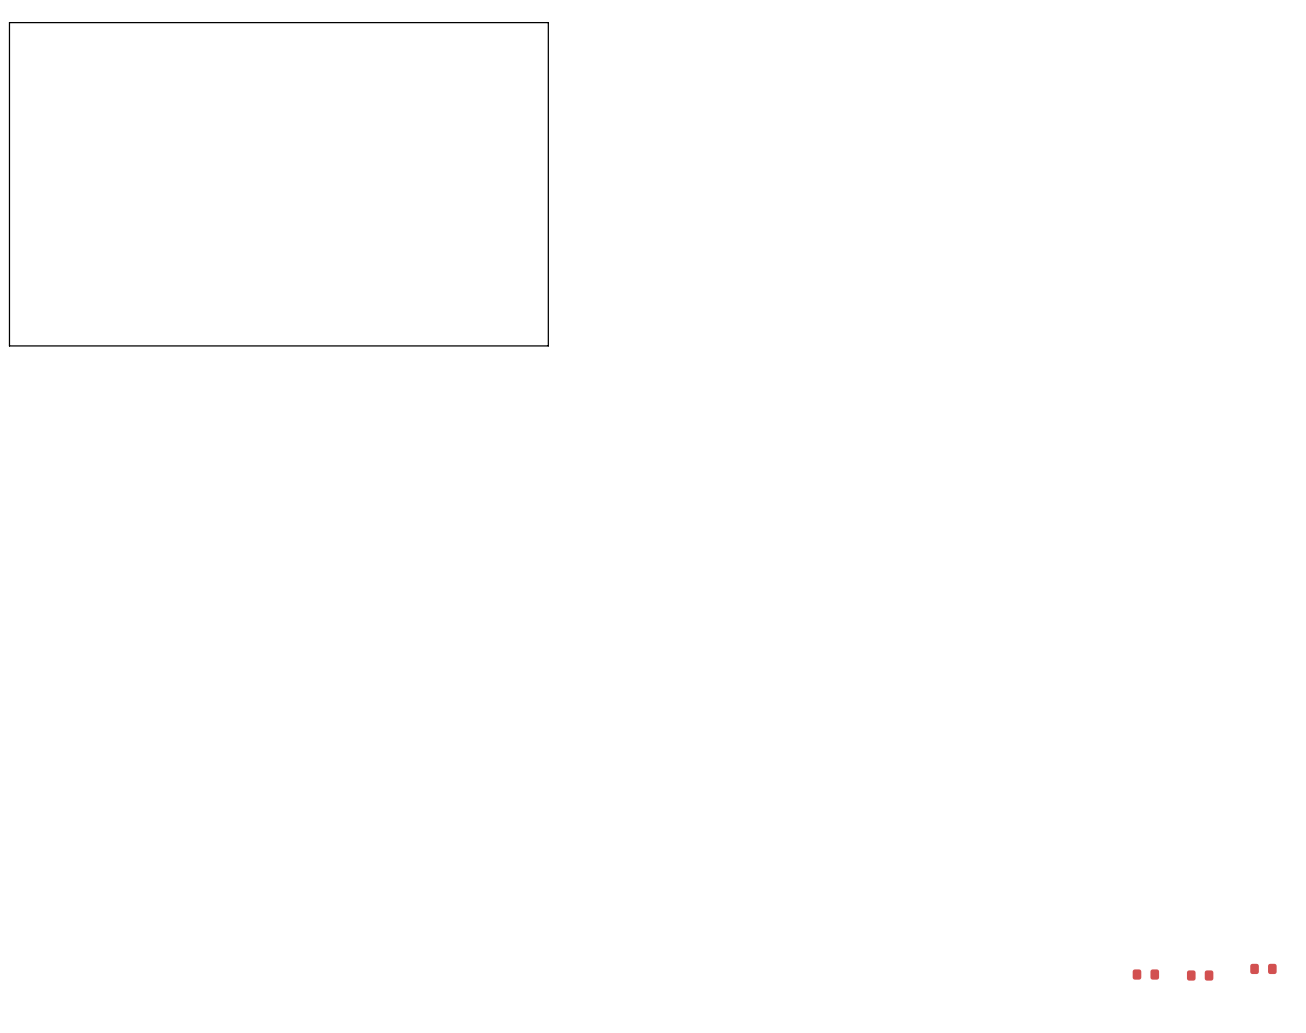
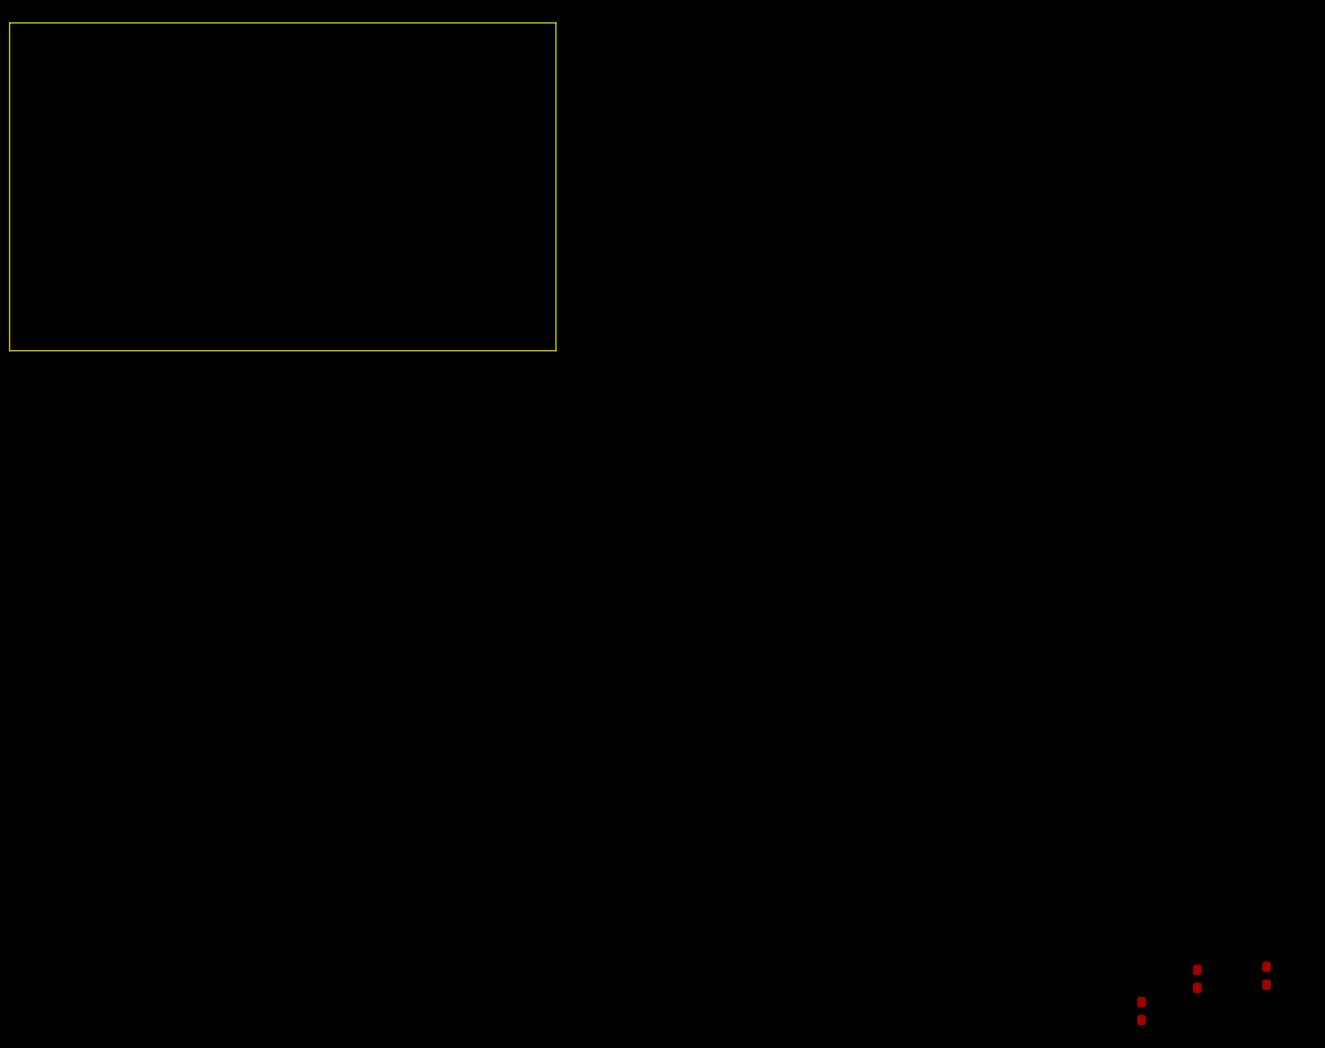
part: none -> (1266, 975)
part: none -> (1197, 978)
part: (1263, 968) -> none
part: (1145, 974) -> none
part: (1200, 975) -> none
part: none -> (1141, 1011)

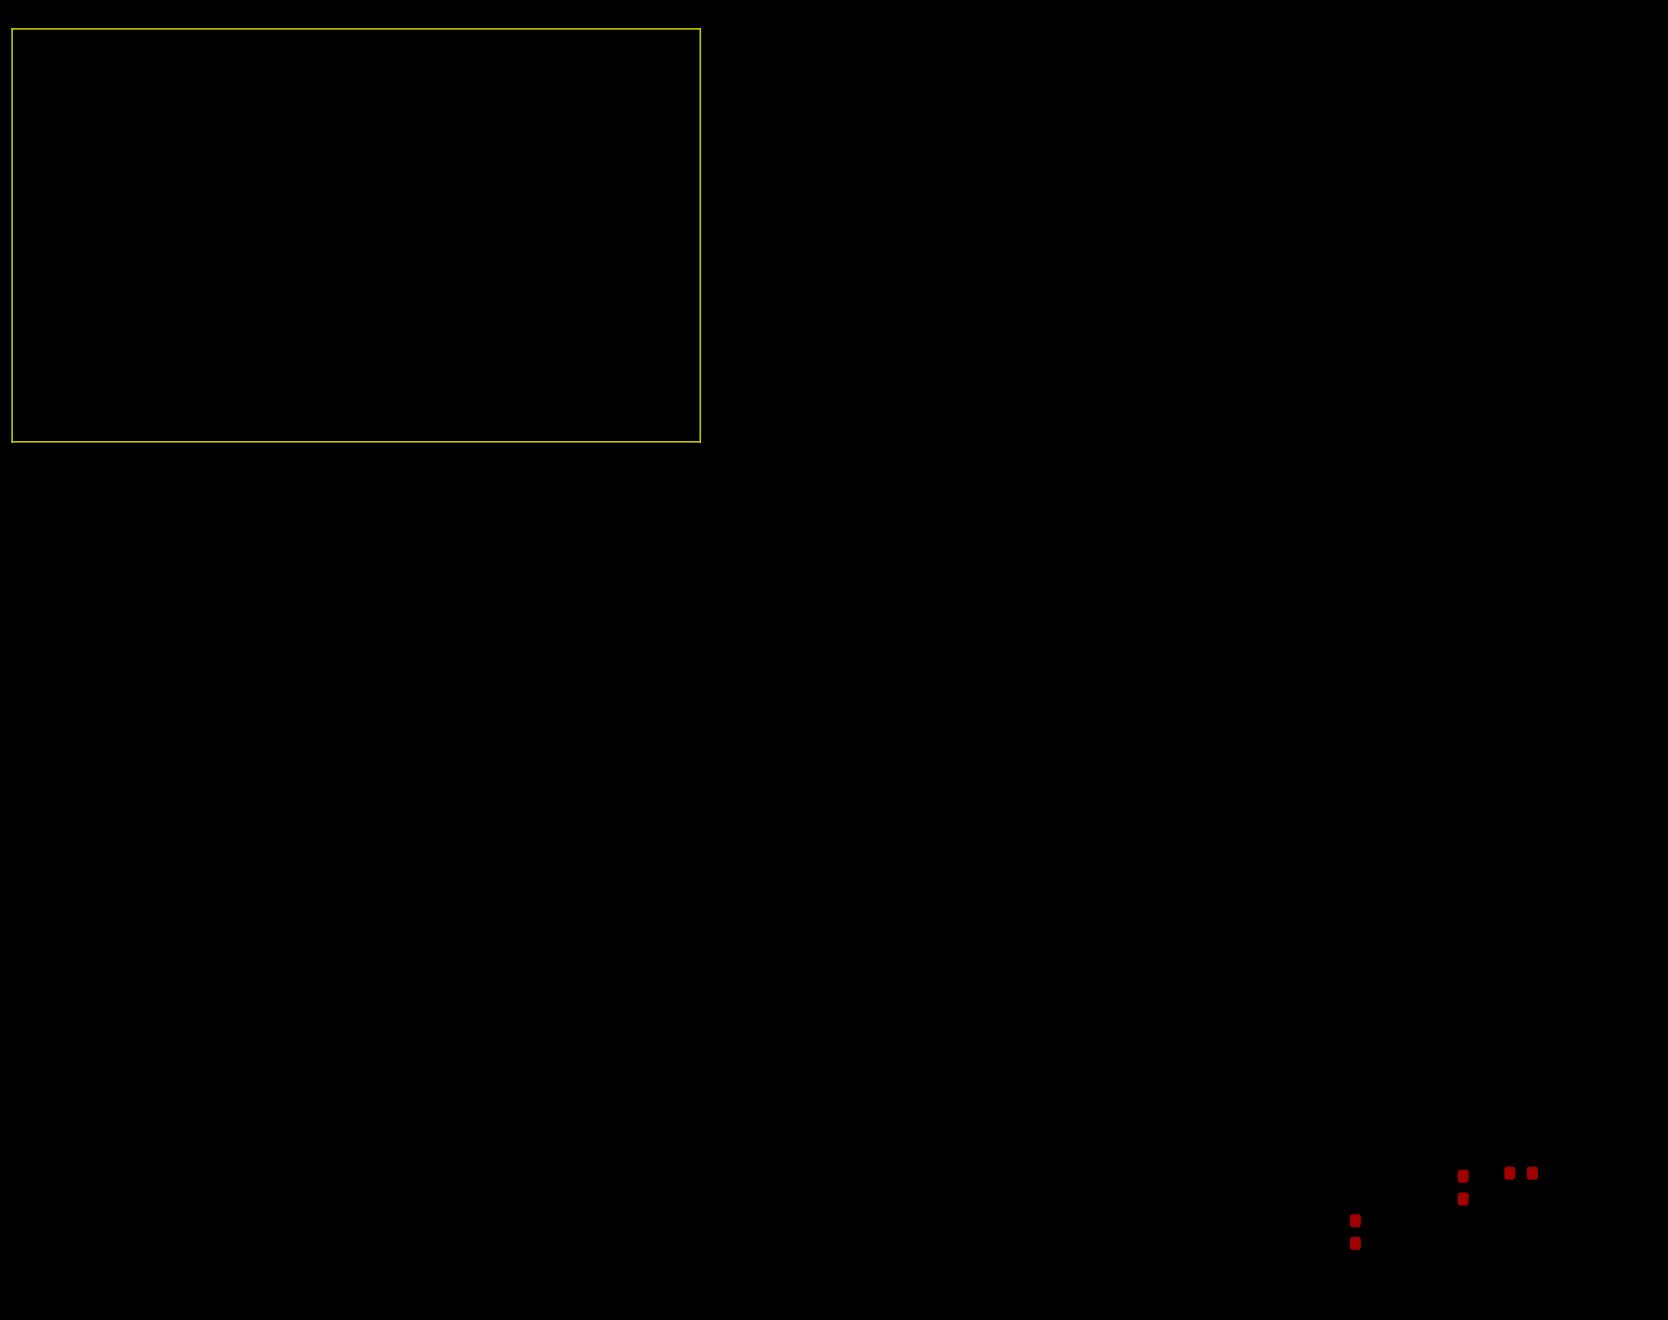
part: none -> (1521, 1173)
part: none -> (1463, 1187)
part: (1266, 975) -> none
part: none -> (1355, 1232)
part: (1197, 978) -> none
part: (1141, 1011) -> none

